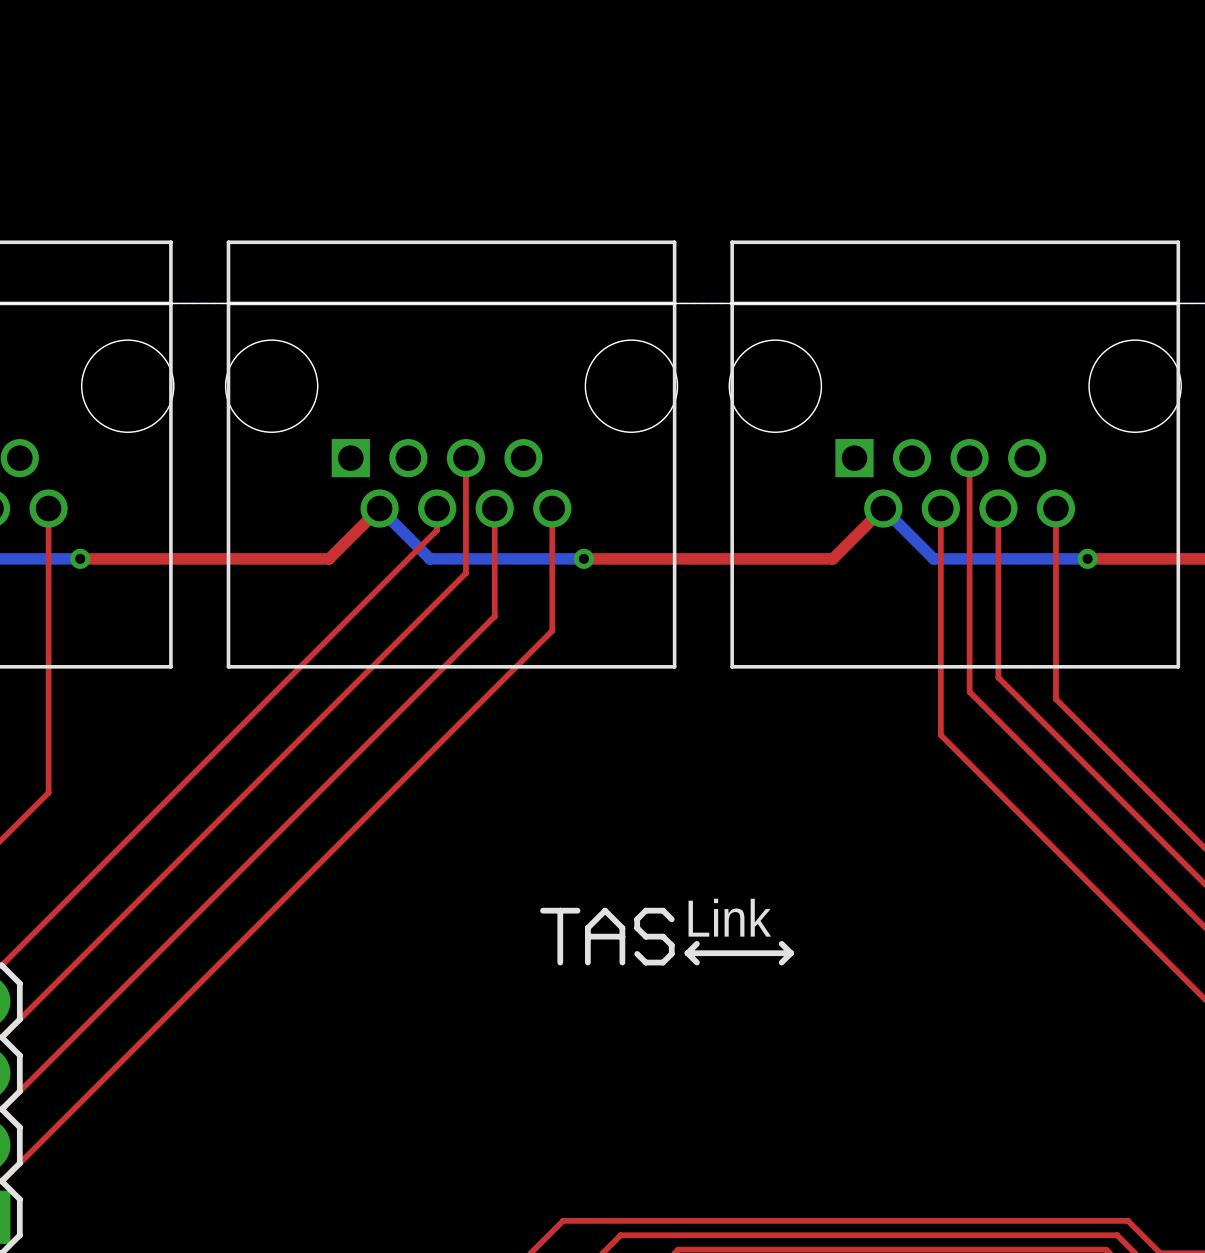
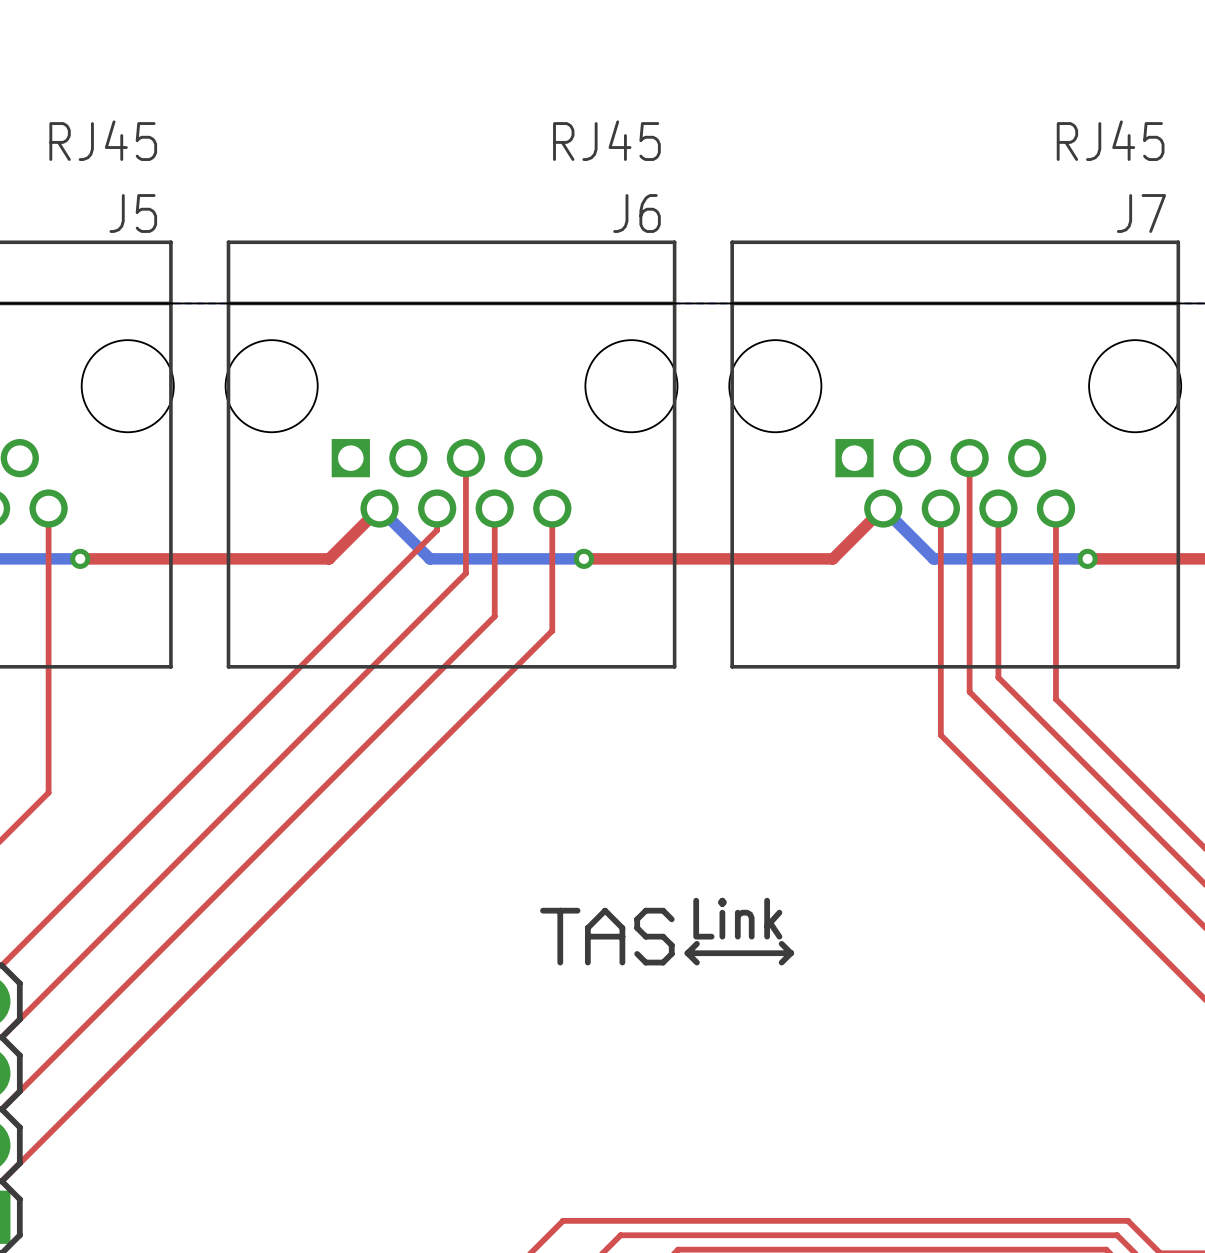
J5 value: none -> RJ45 (103, 140)
J6 value: none -> RJ45 (606, 140)
J7 value: none -> RJ45 (1110, 140)
J5 name: none -> J5 (133, 213)
J6 name: none -> J6 (636, 213)
J7 name: none -> J7 (1141, 213)

